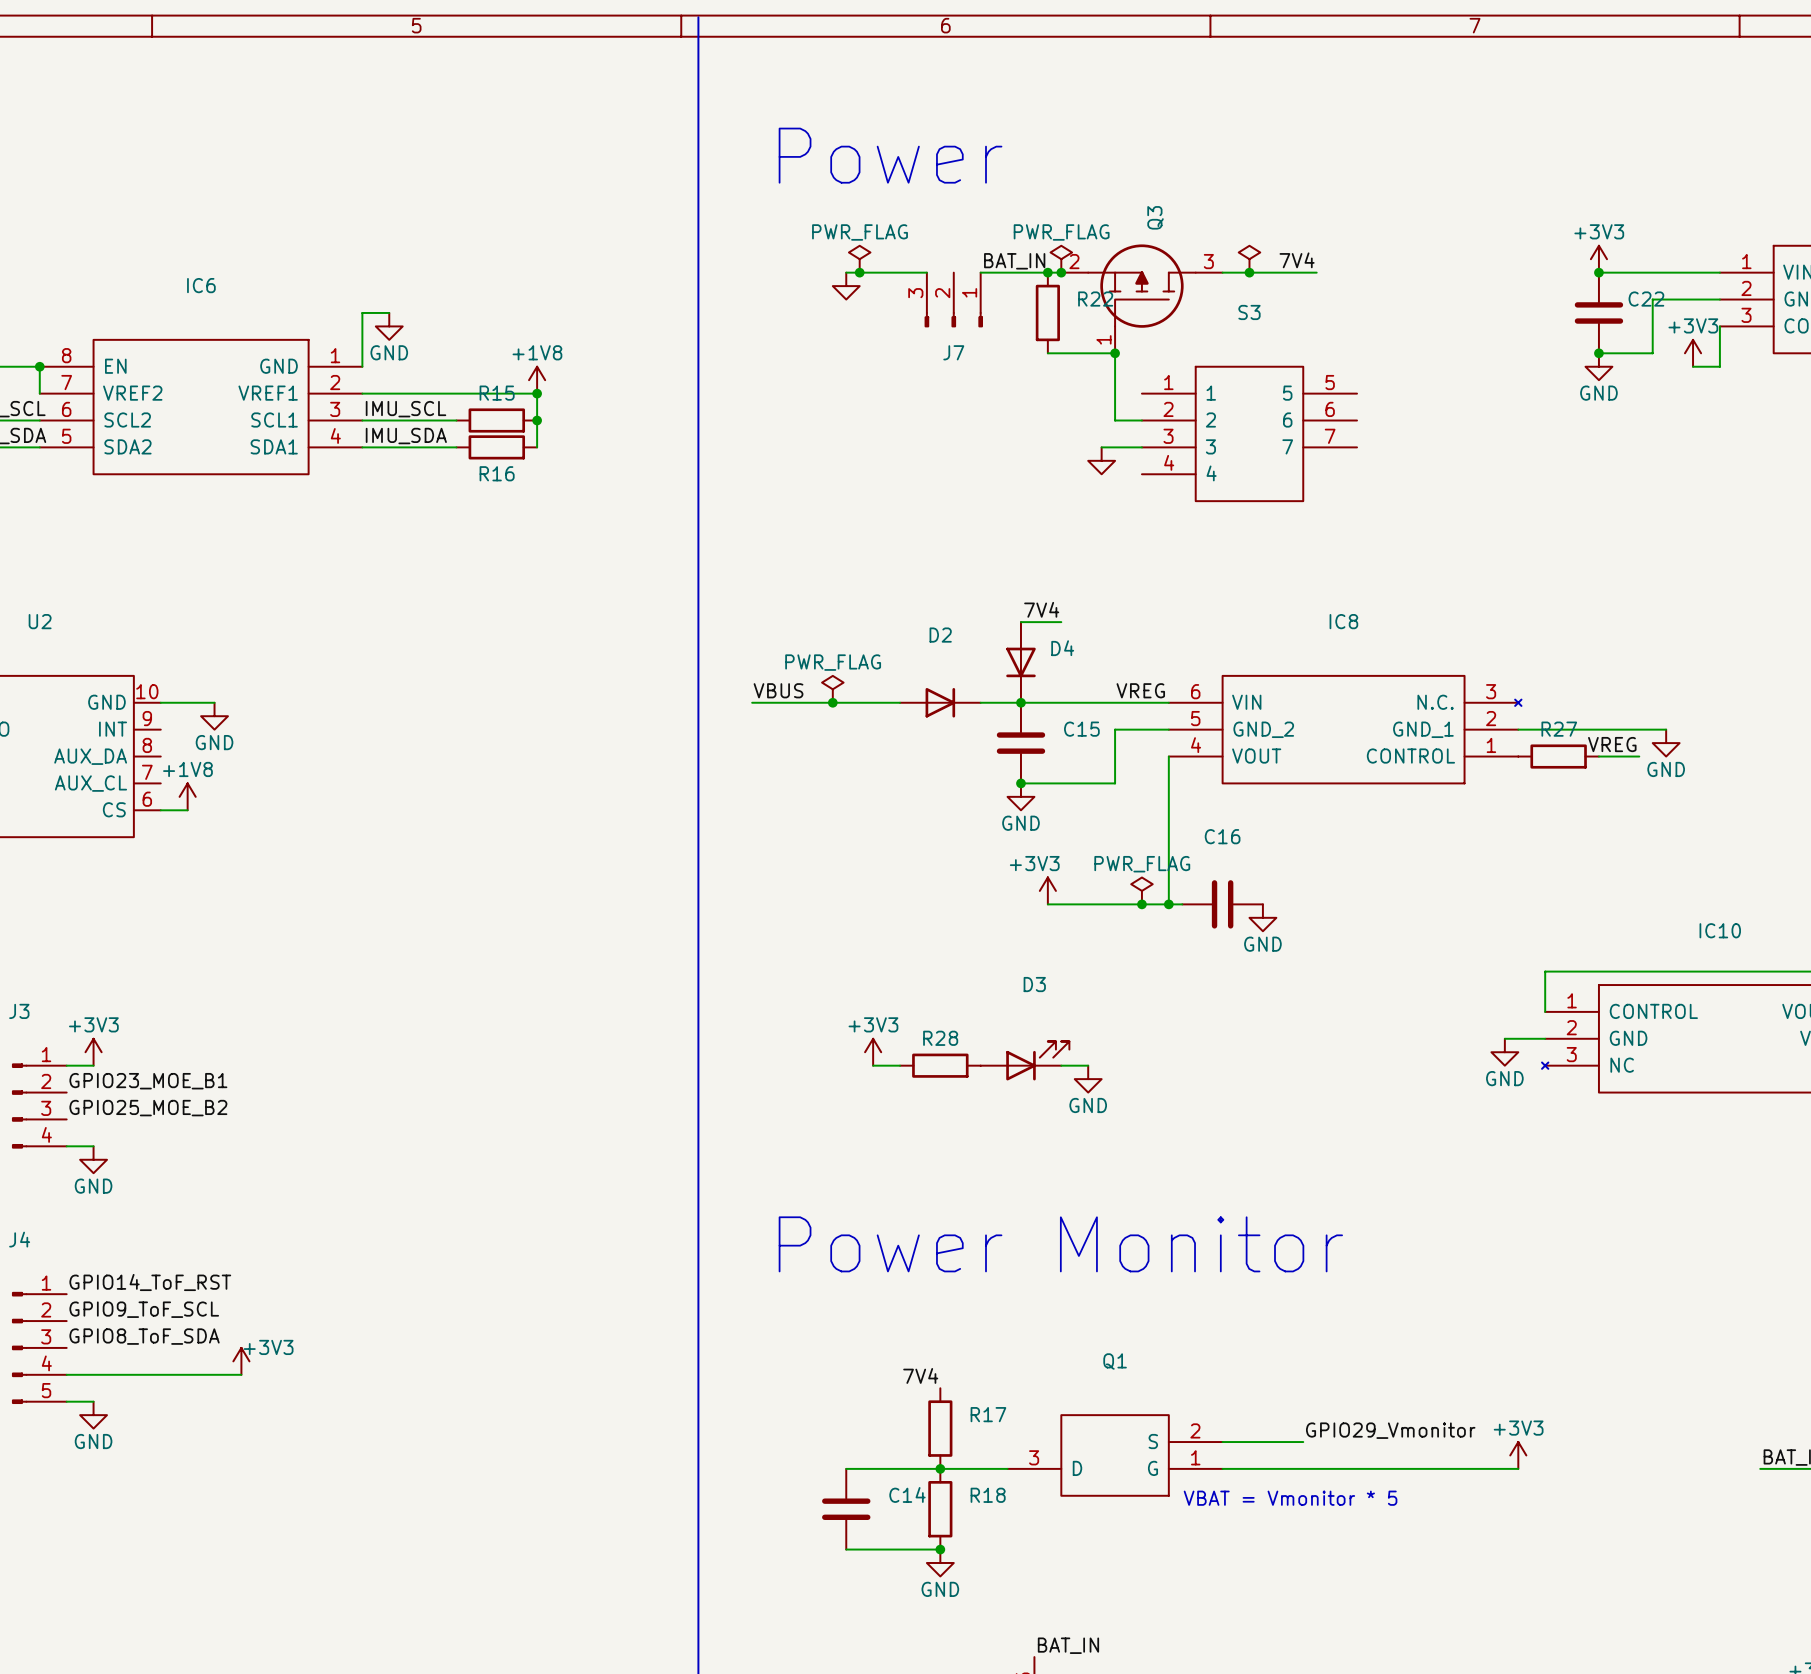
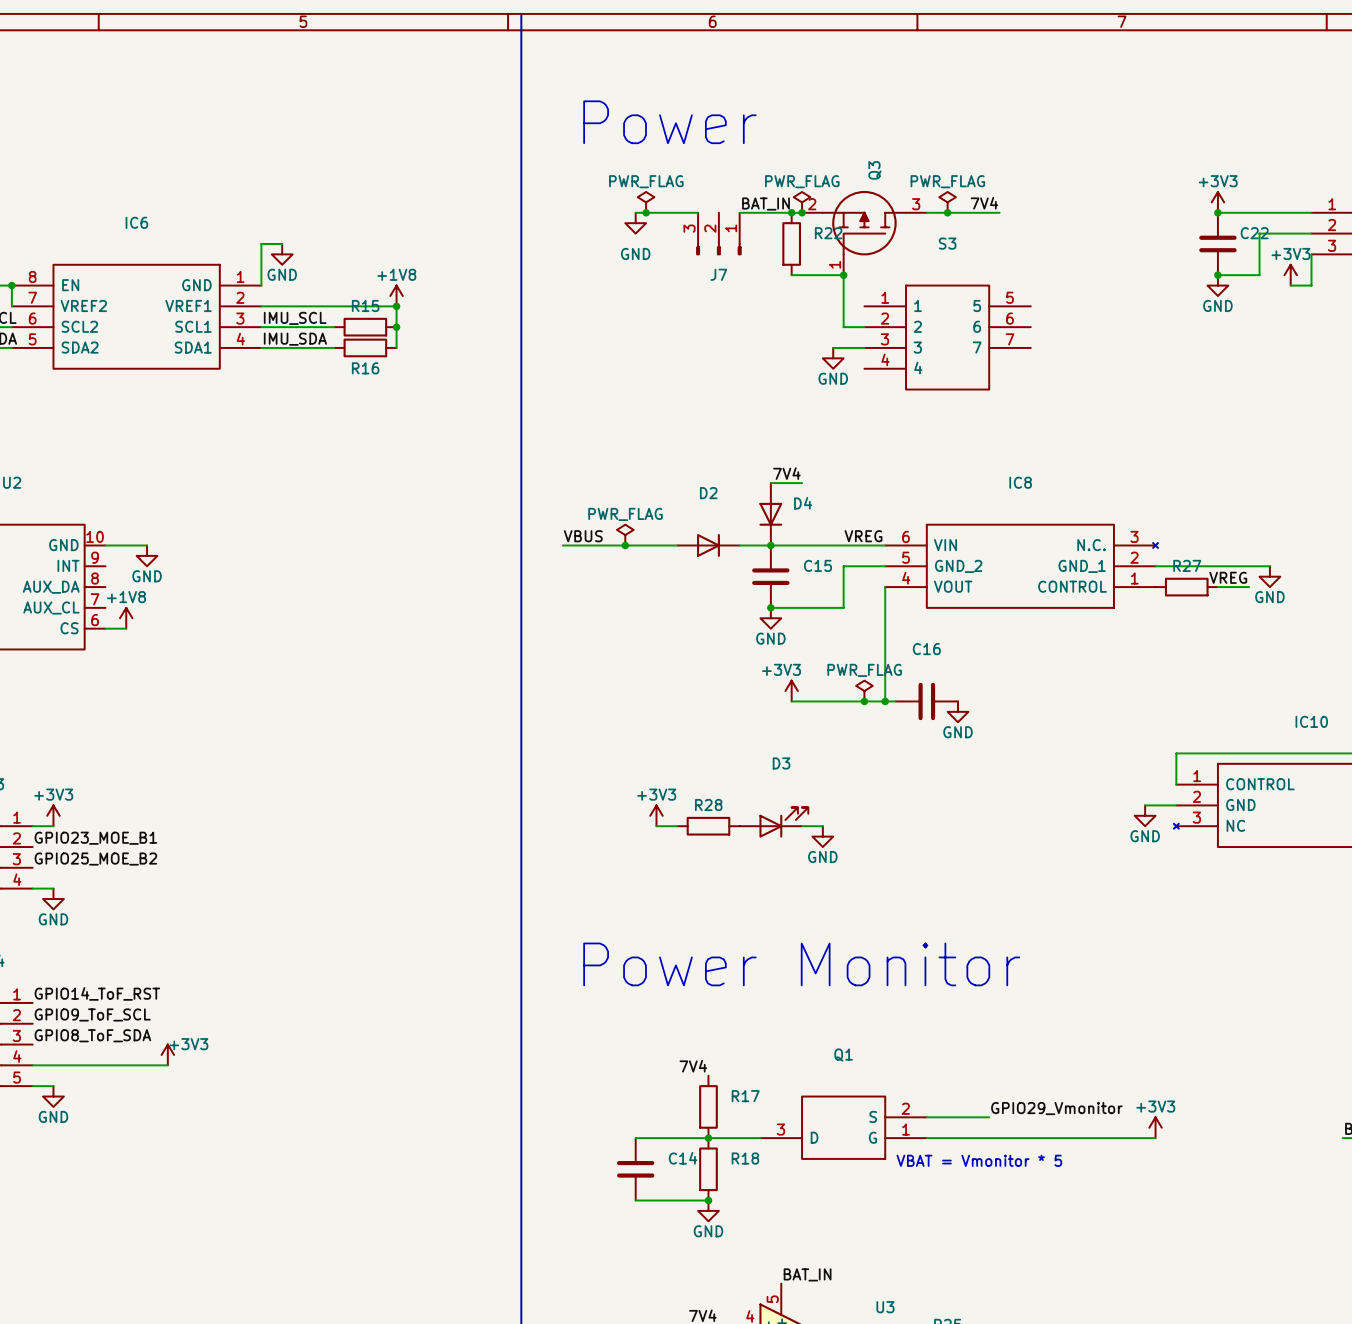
power symbol text: none -> PWR_FLAG (947, 181)
power symbol text: none -> GND (635, 253)
power symbol text: none -> GND (833, 378)

